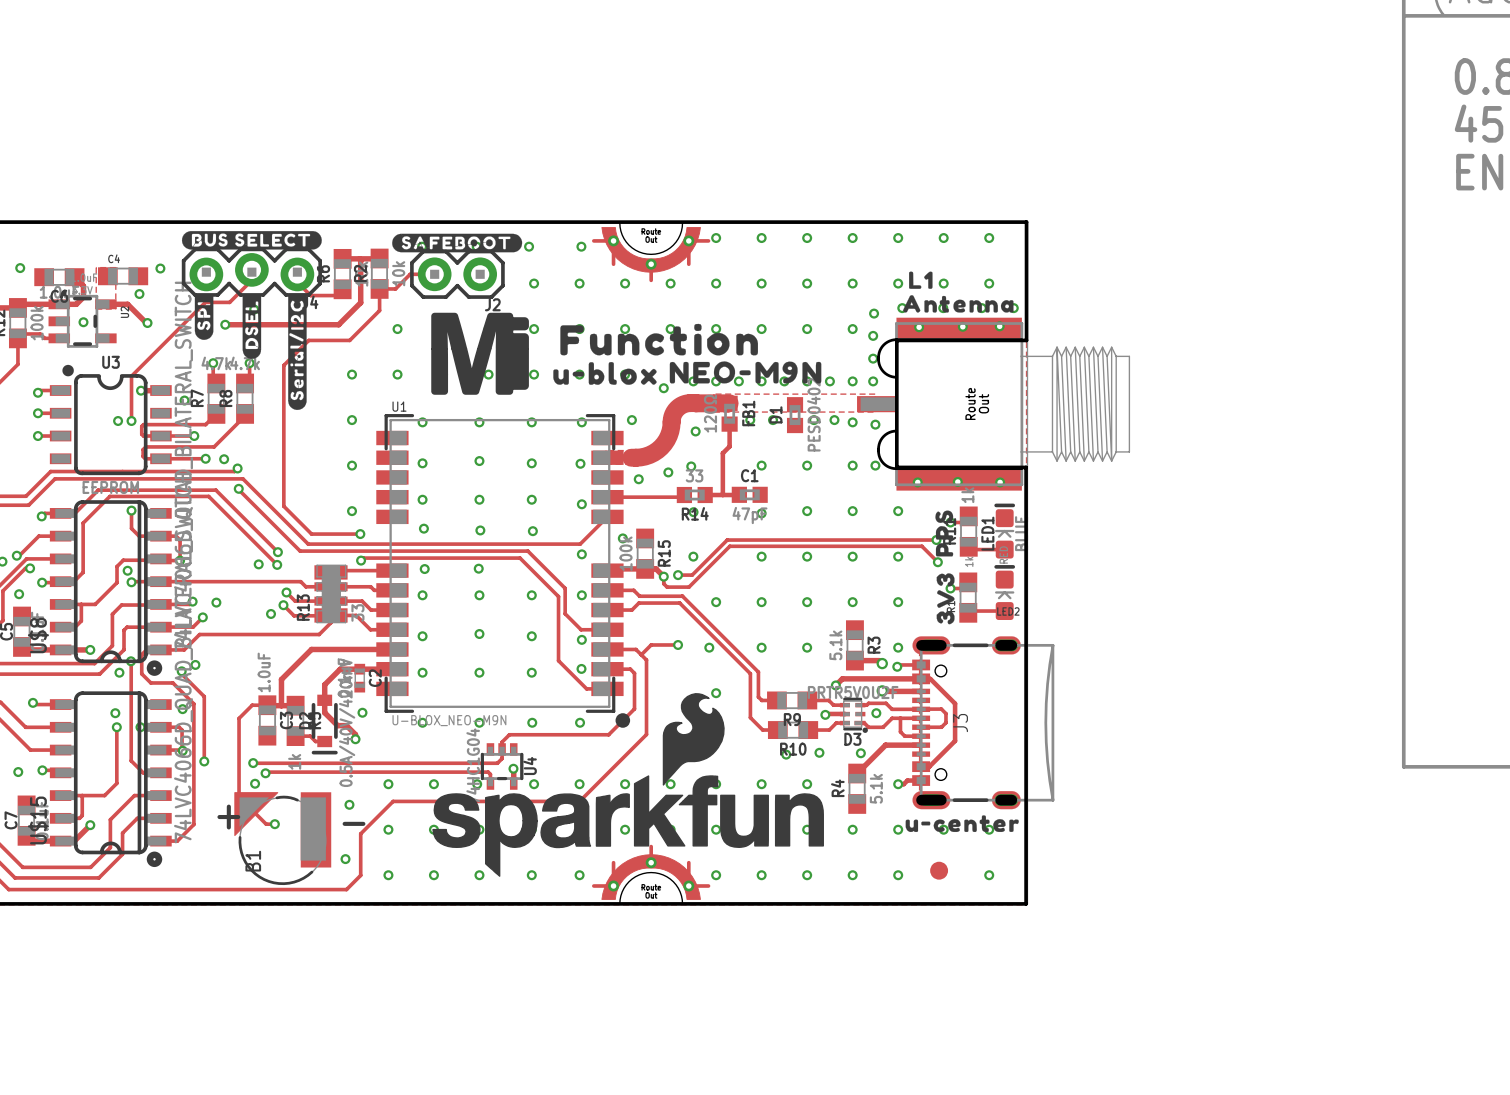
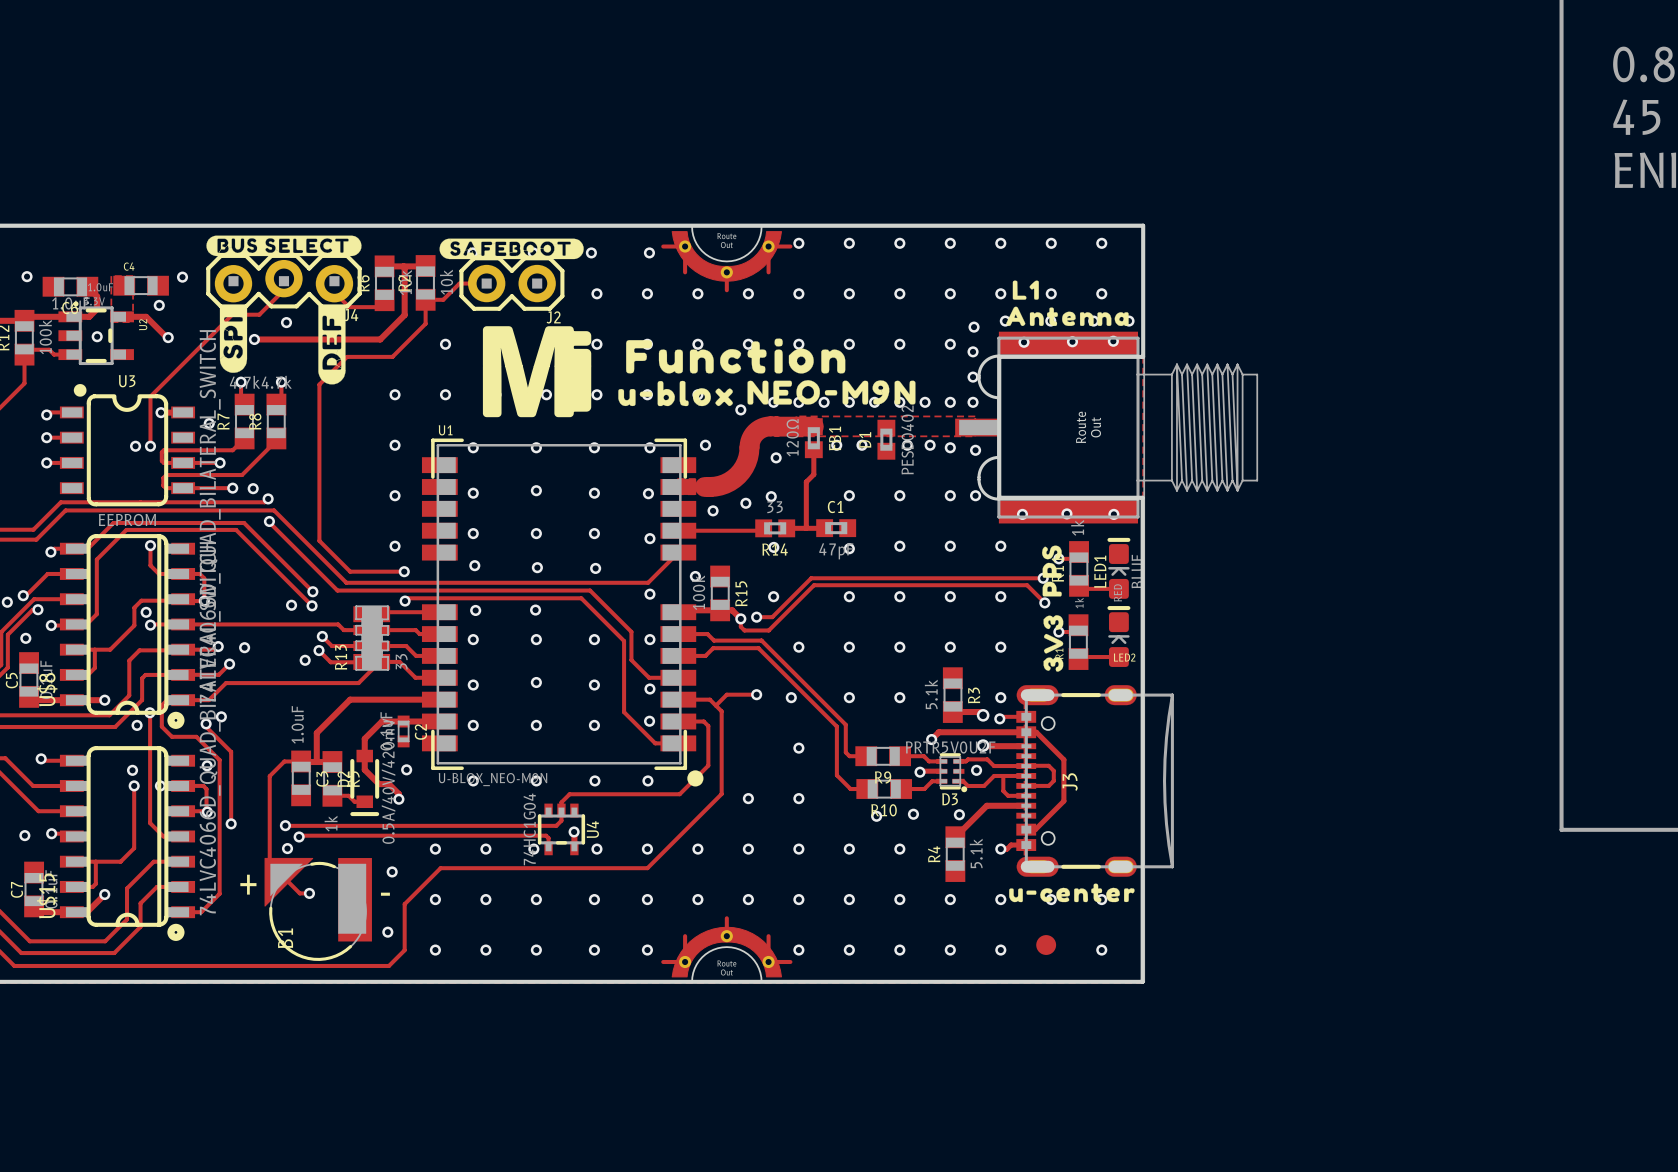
drawing: [288, 293, 307, 411] -> none
drawing: [242, 294, 262, 359] -> none
drawing: none -> [318, 305, 346, 385]
drawing shape: [194, 295, 214, 340] -> [219, 307, 248, 373]
drawing: [432, 693, 824, 877] -> none

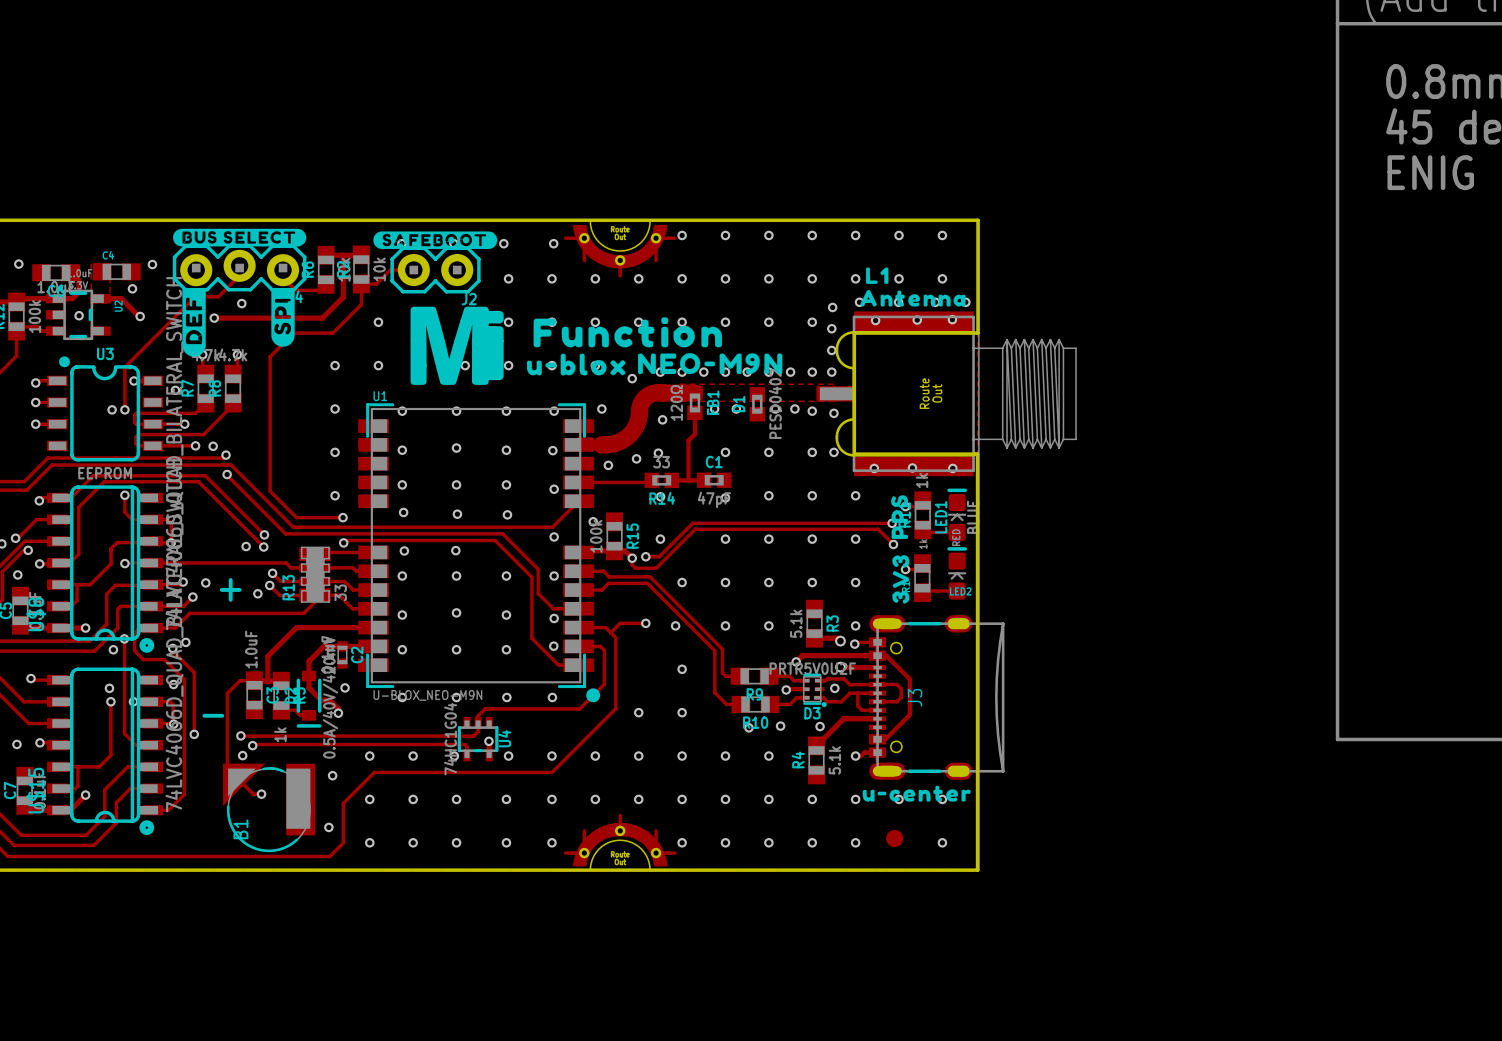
drawing position: (233, 340) -> (283, 318)
drawing position: (331, 345) -> (194, 322)
via: (146, 612) -> none
text position: + (248, 884) -> + (230, 589)
text position: - (385, 894) -> - (213, 715)

